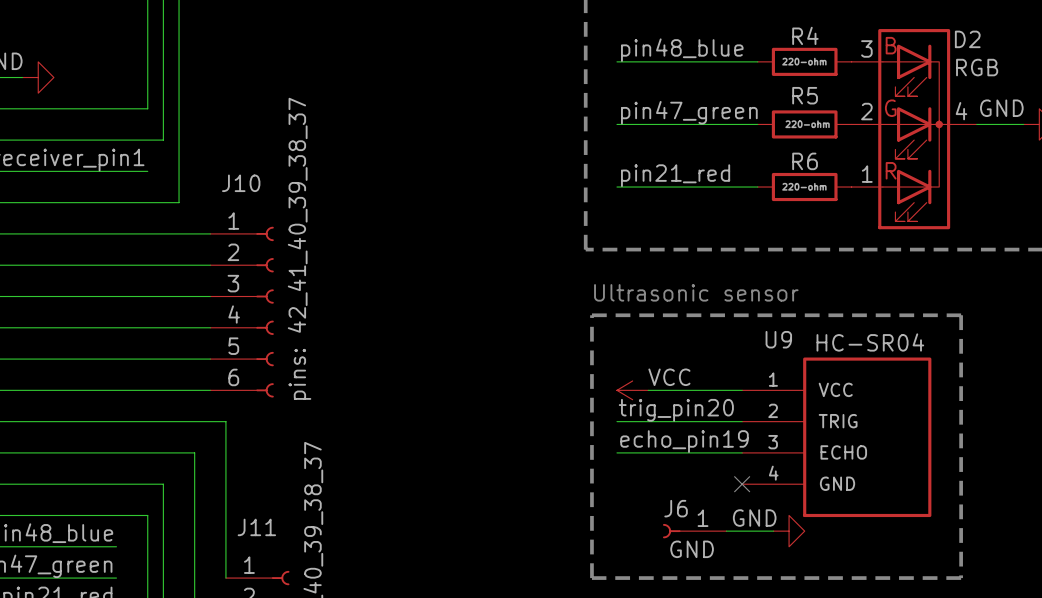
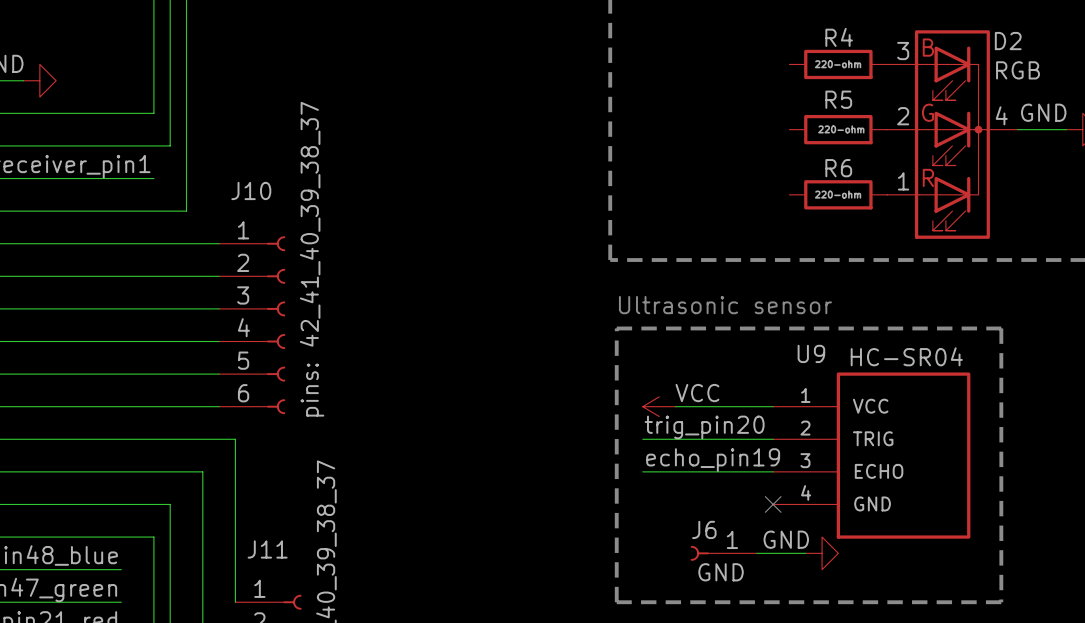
label: pin48_blue (682, 50) -> none
wire: (616, 61) (757, 61) -> none
label: pin47_green (689, 112) -> none
wire: (616, 124) (757, 124) -> none
label: pin21_red (675, 175) -> none
wire: (616, 187) (757, 187) -> none

